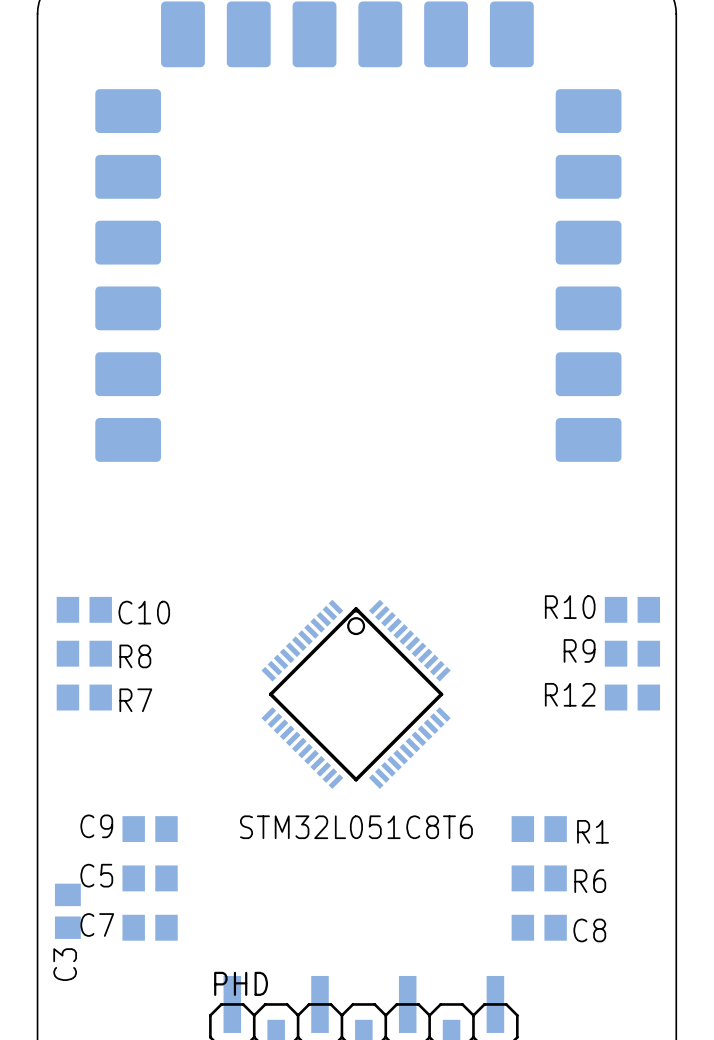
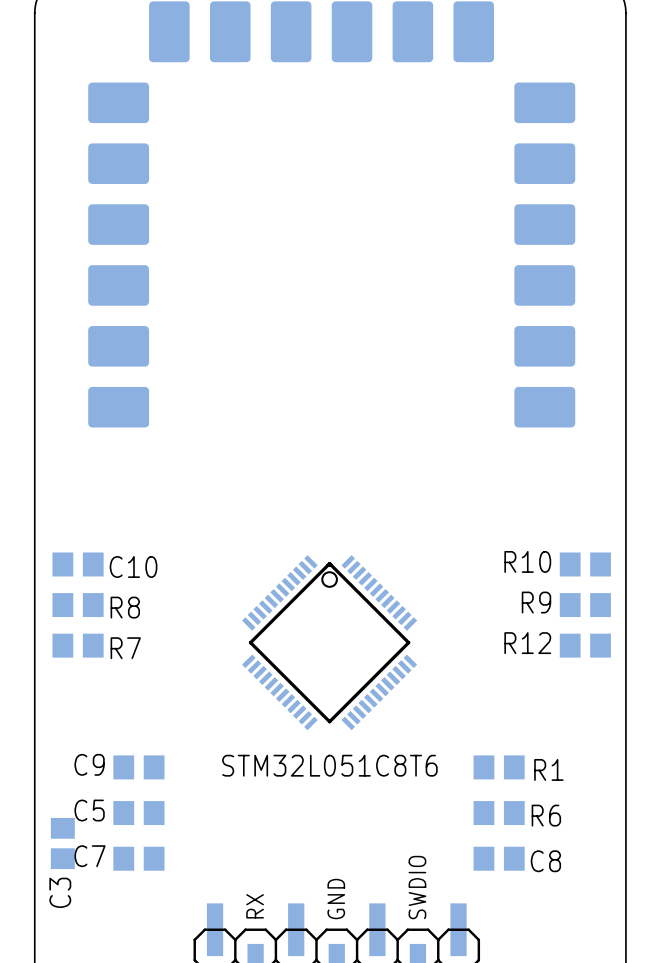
text: none -> SWDIO (417, 887)
text: none -> GND (336, 899)
text: none -> RX (255, 906)
PHD name: PHD (241, 983) -> none

